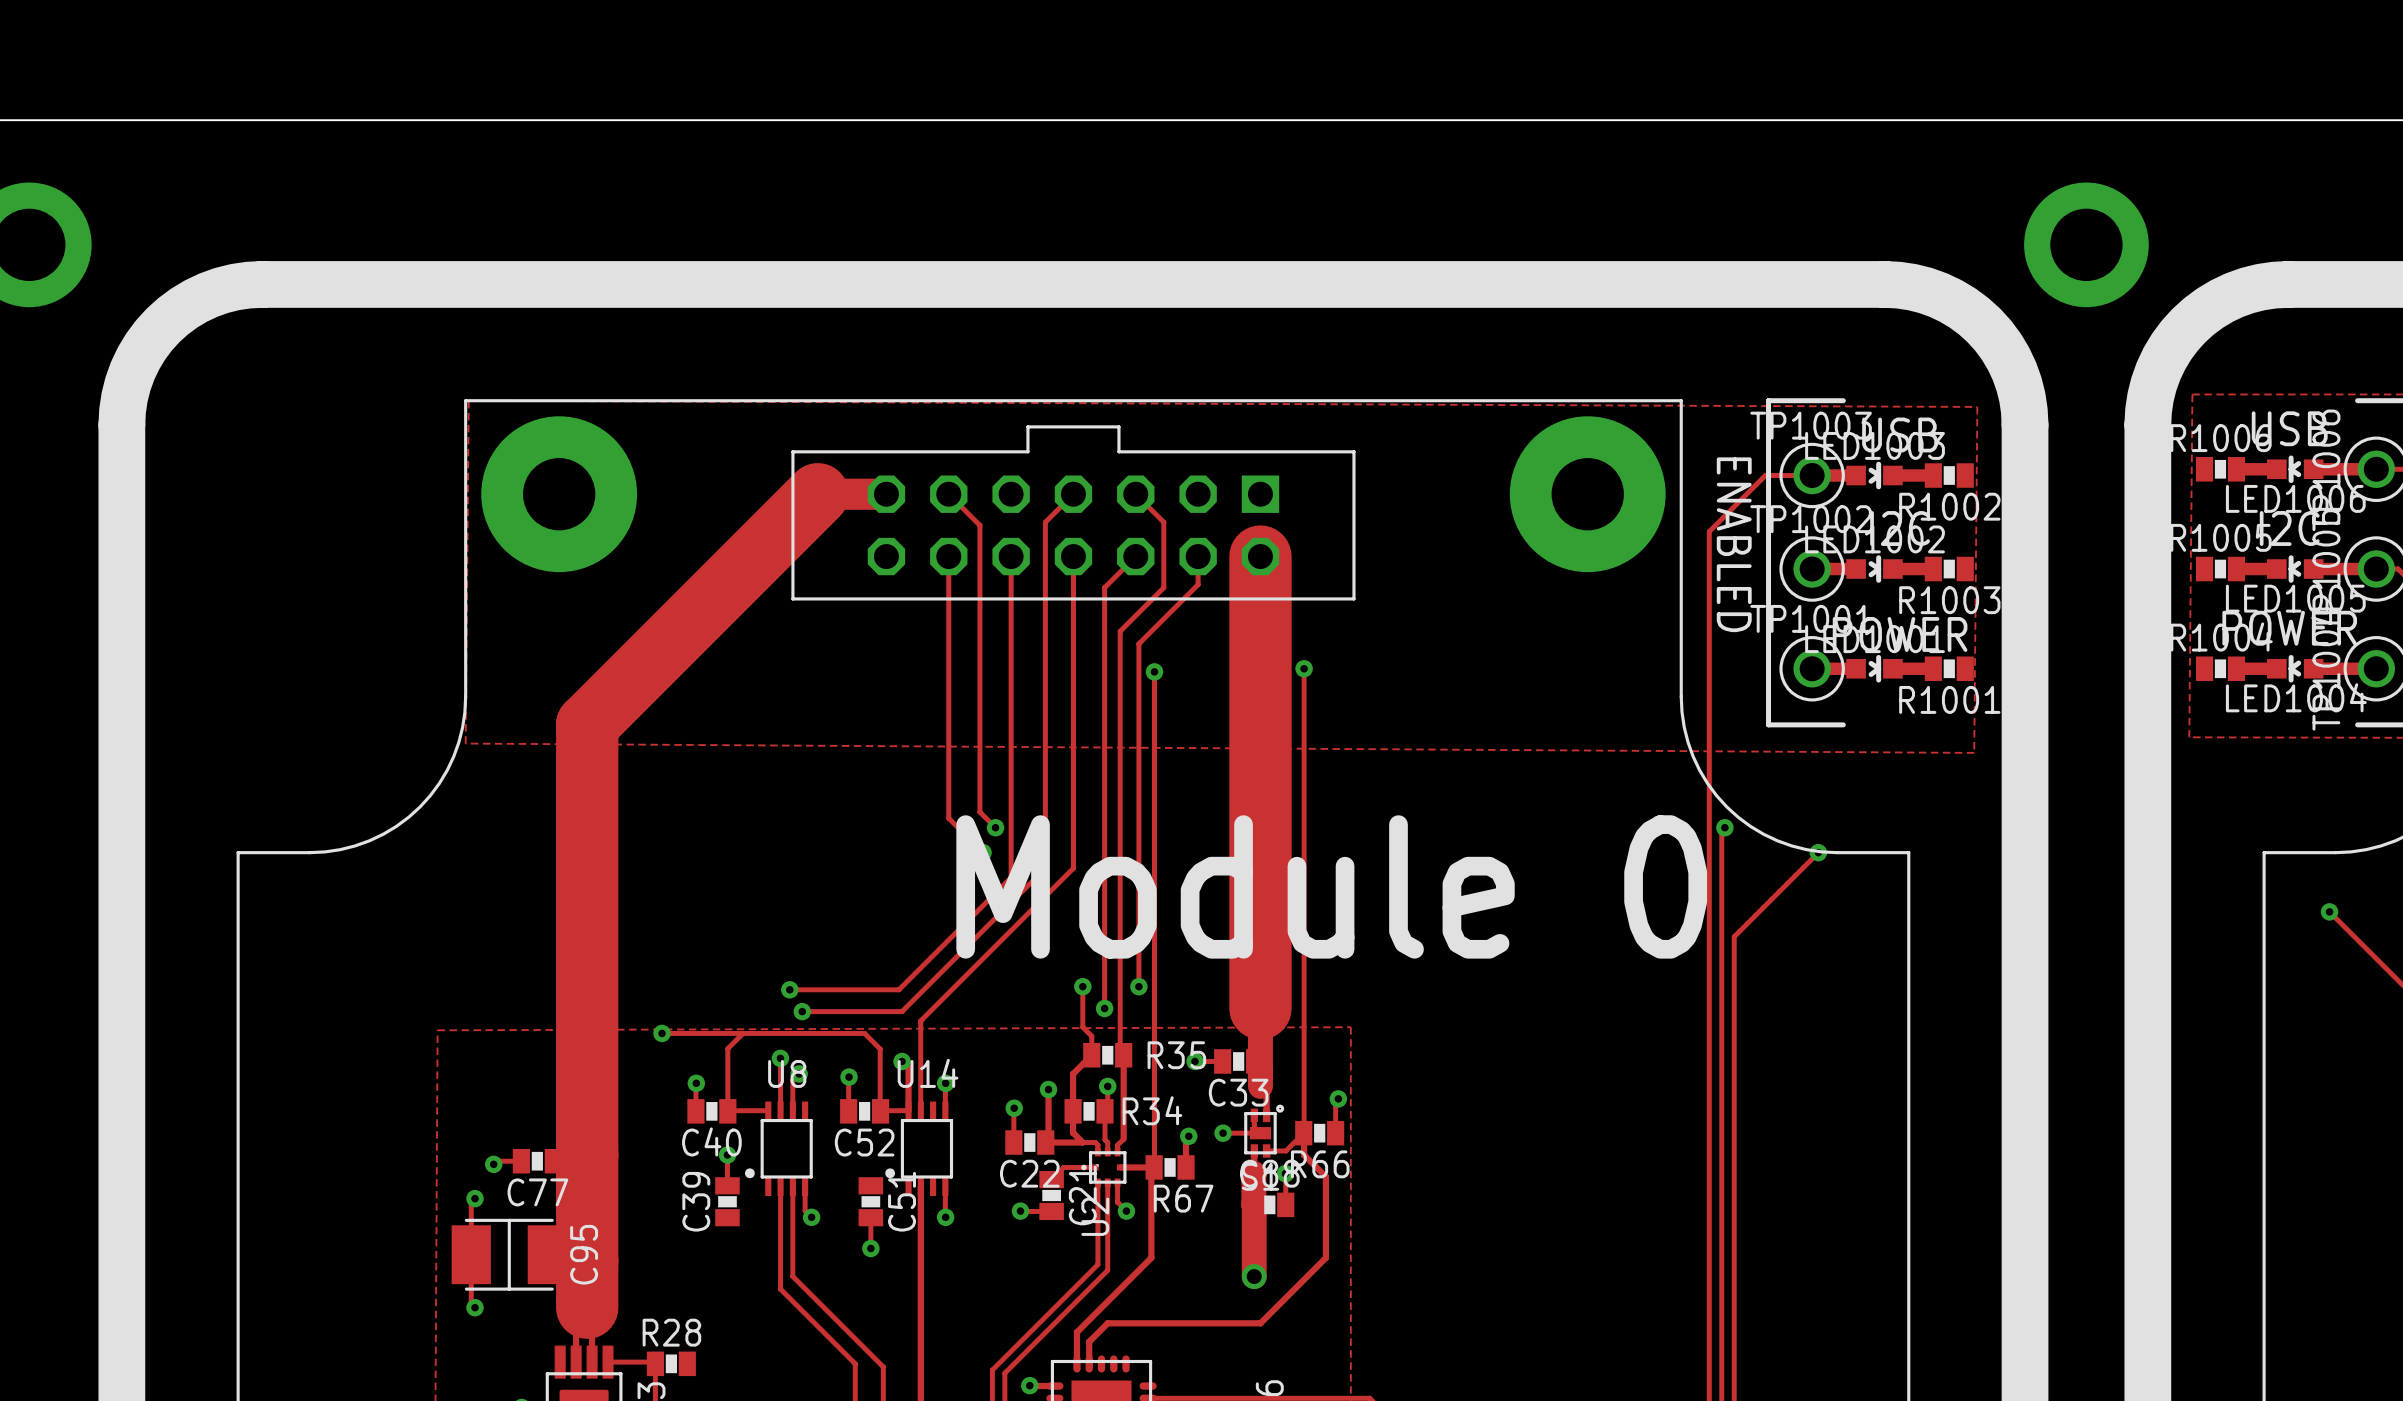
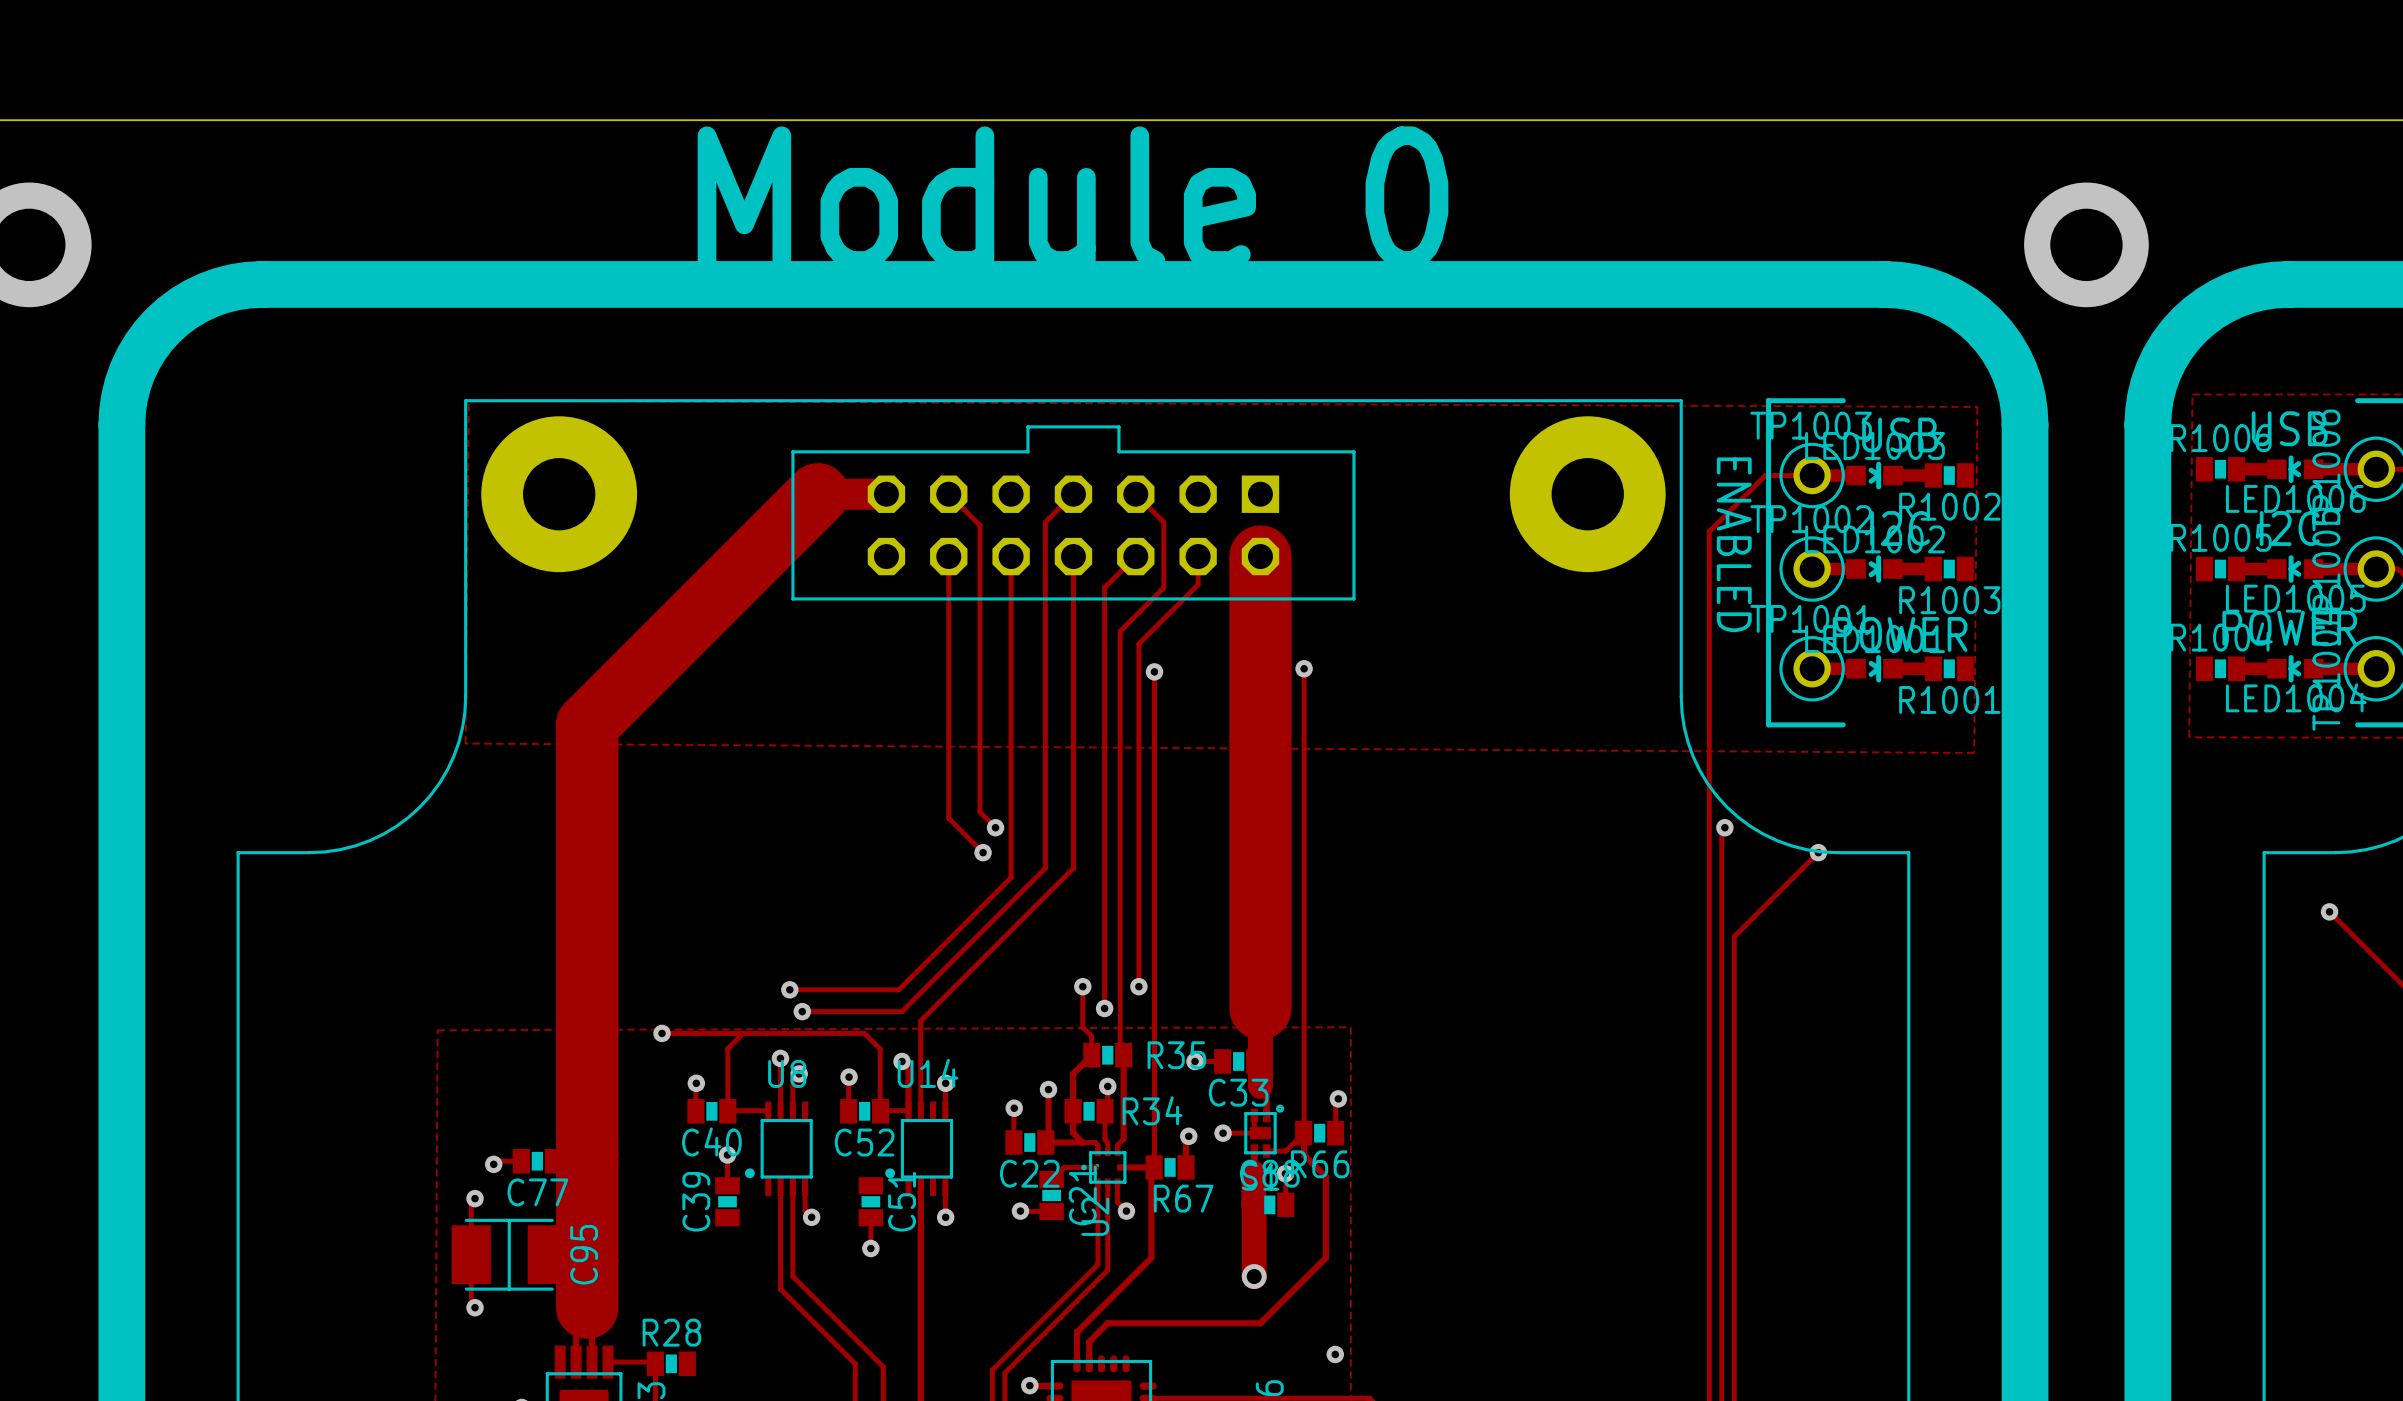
text: none -> Module 0 (1073, 198)
text: Module 0 (1331, 886) -> none
via: none -> (1335, 1354)

